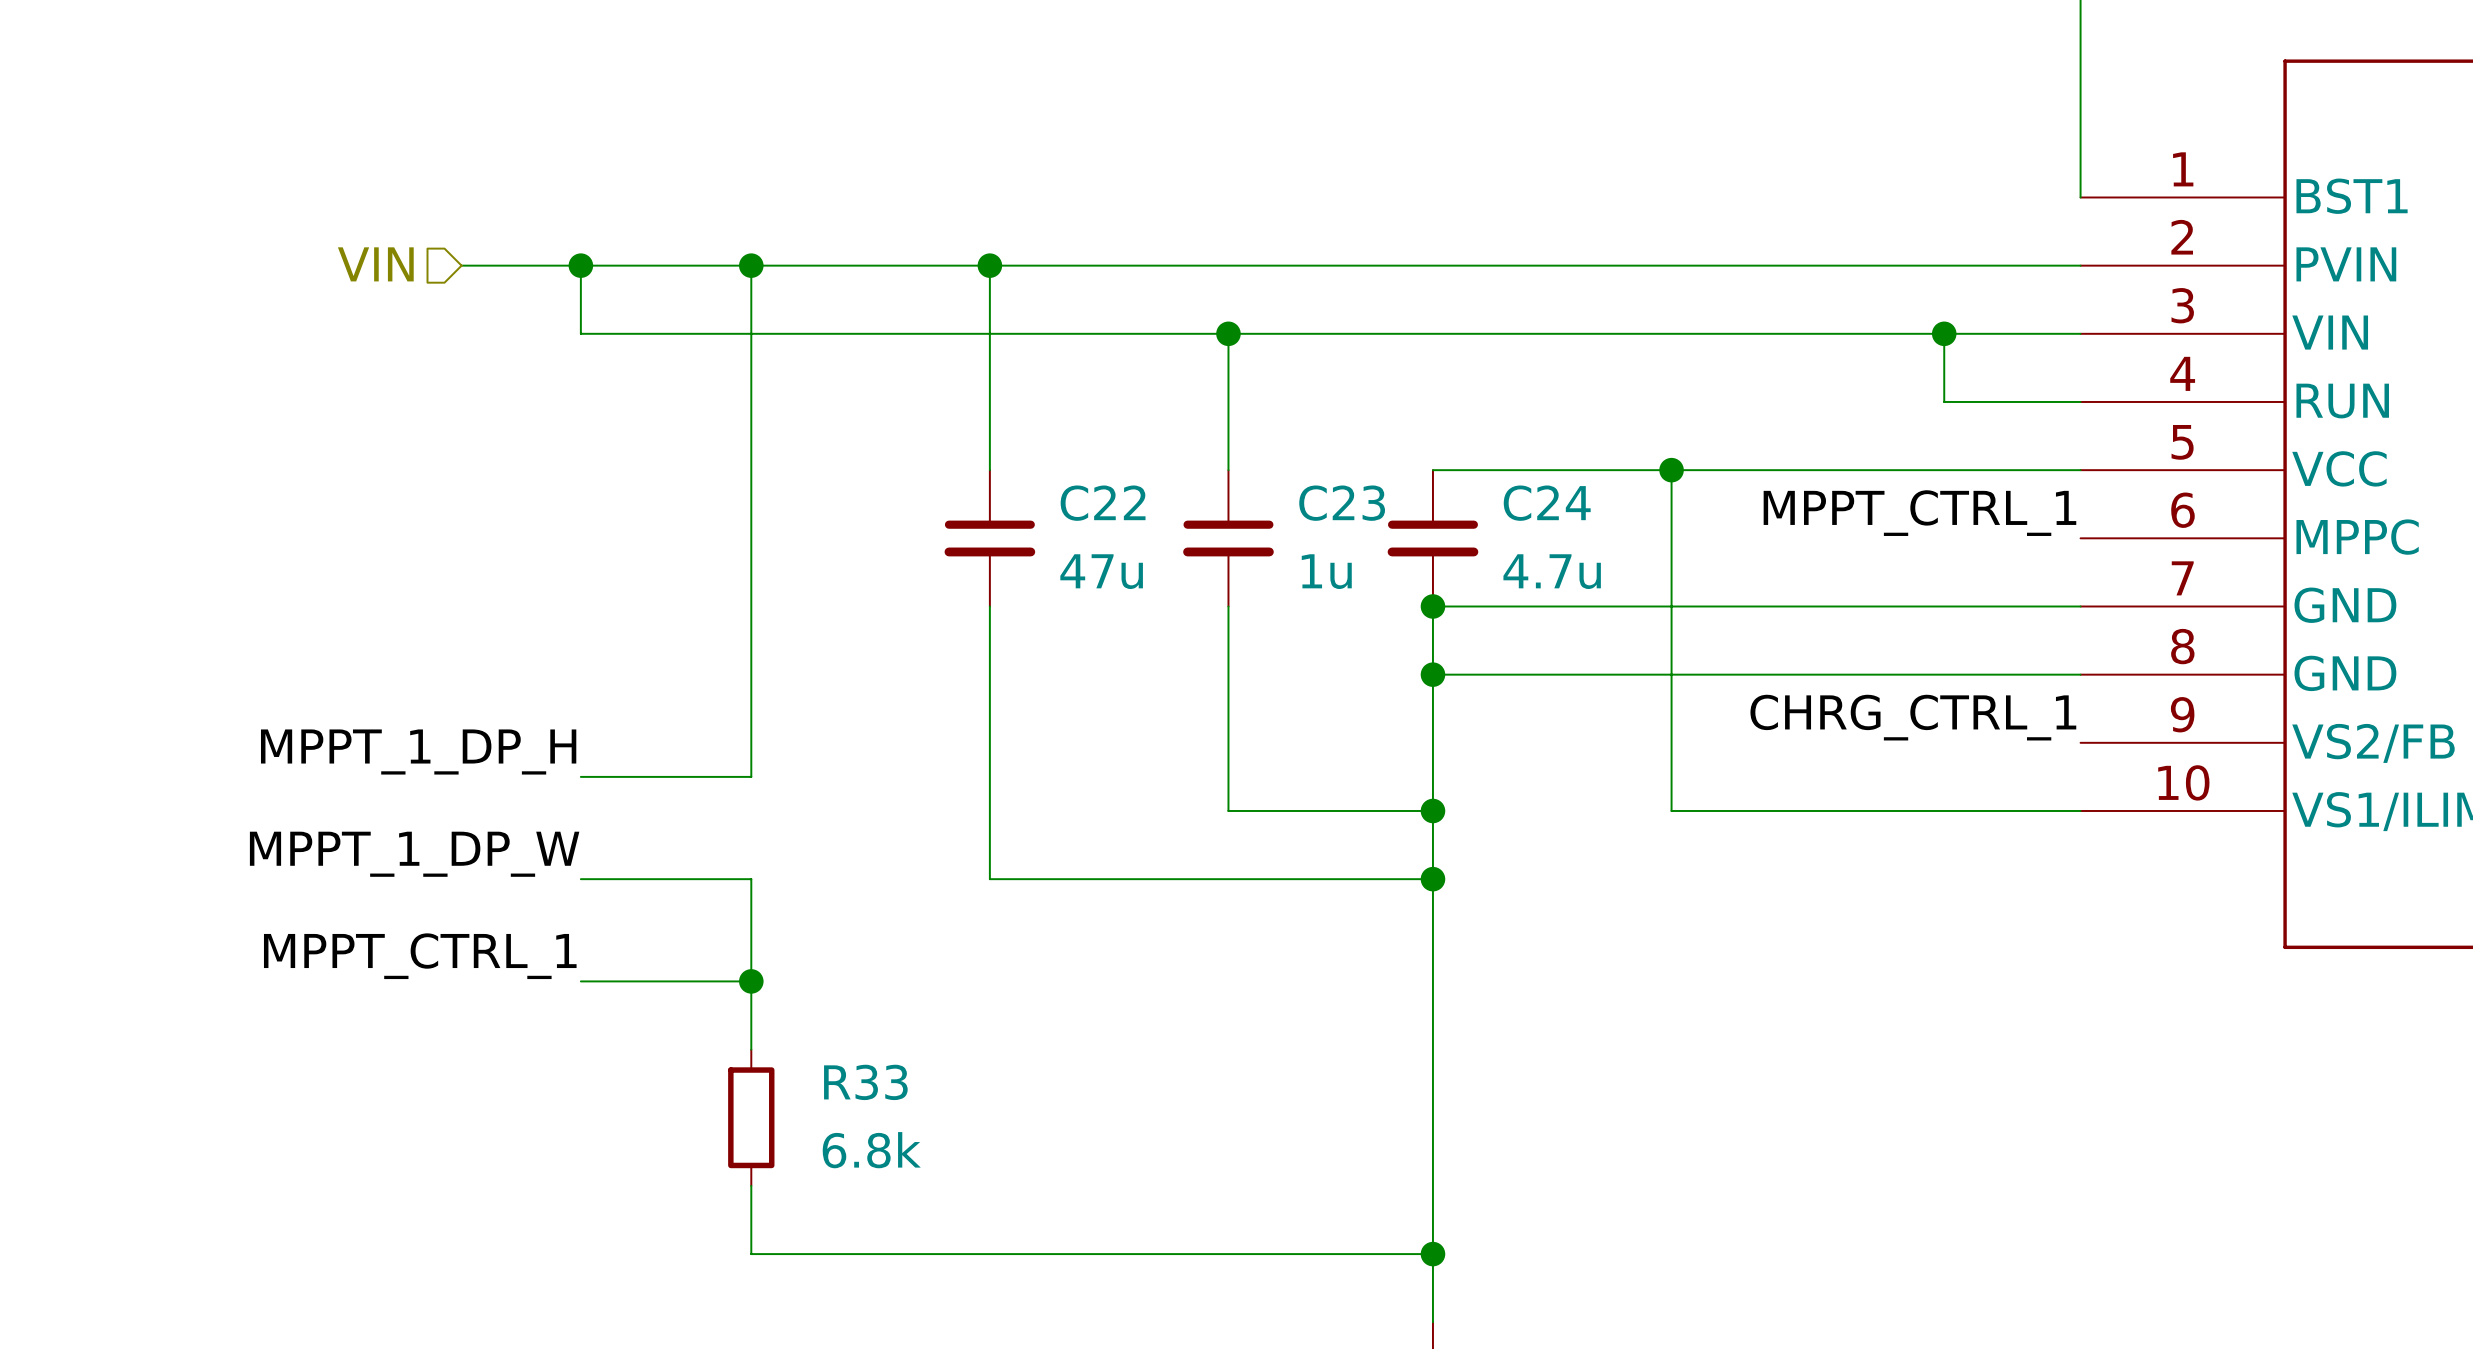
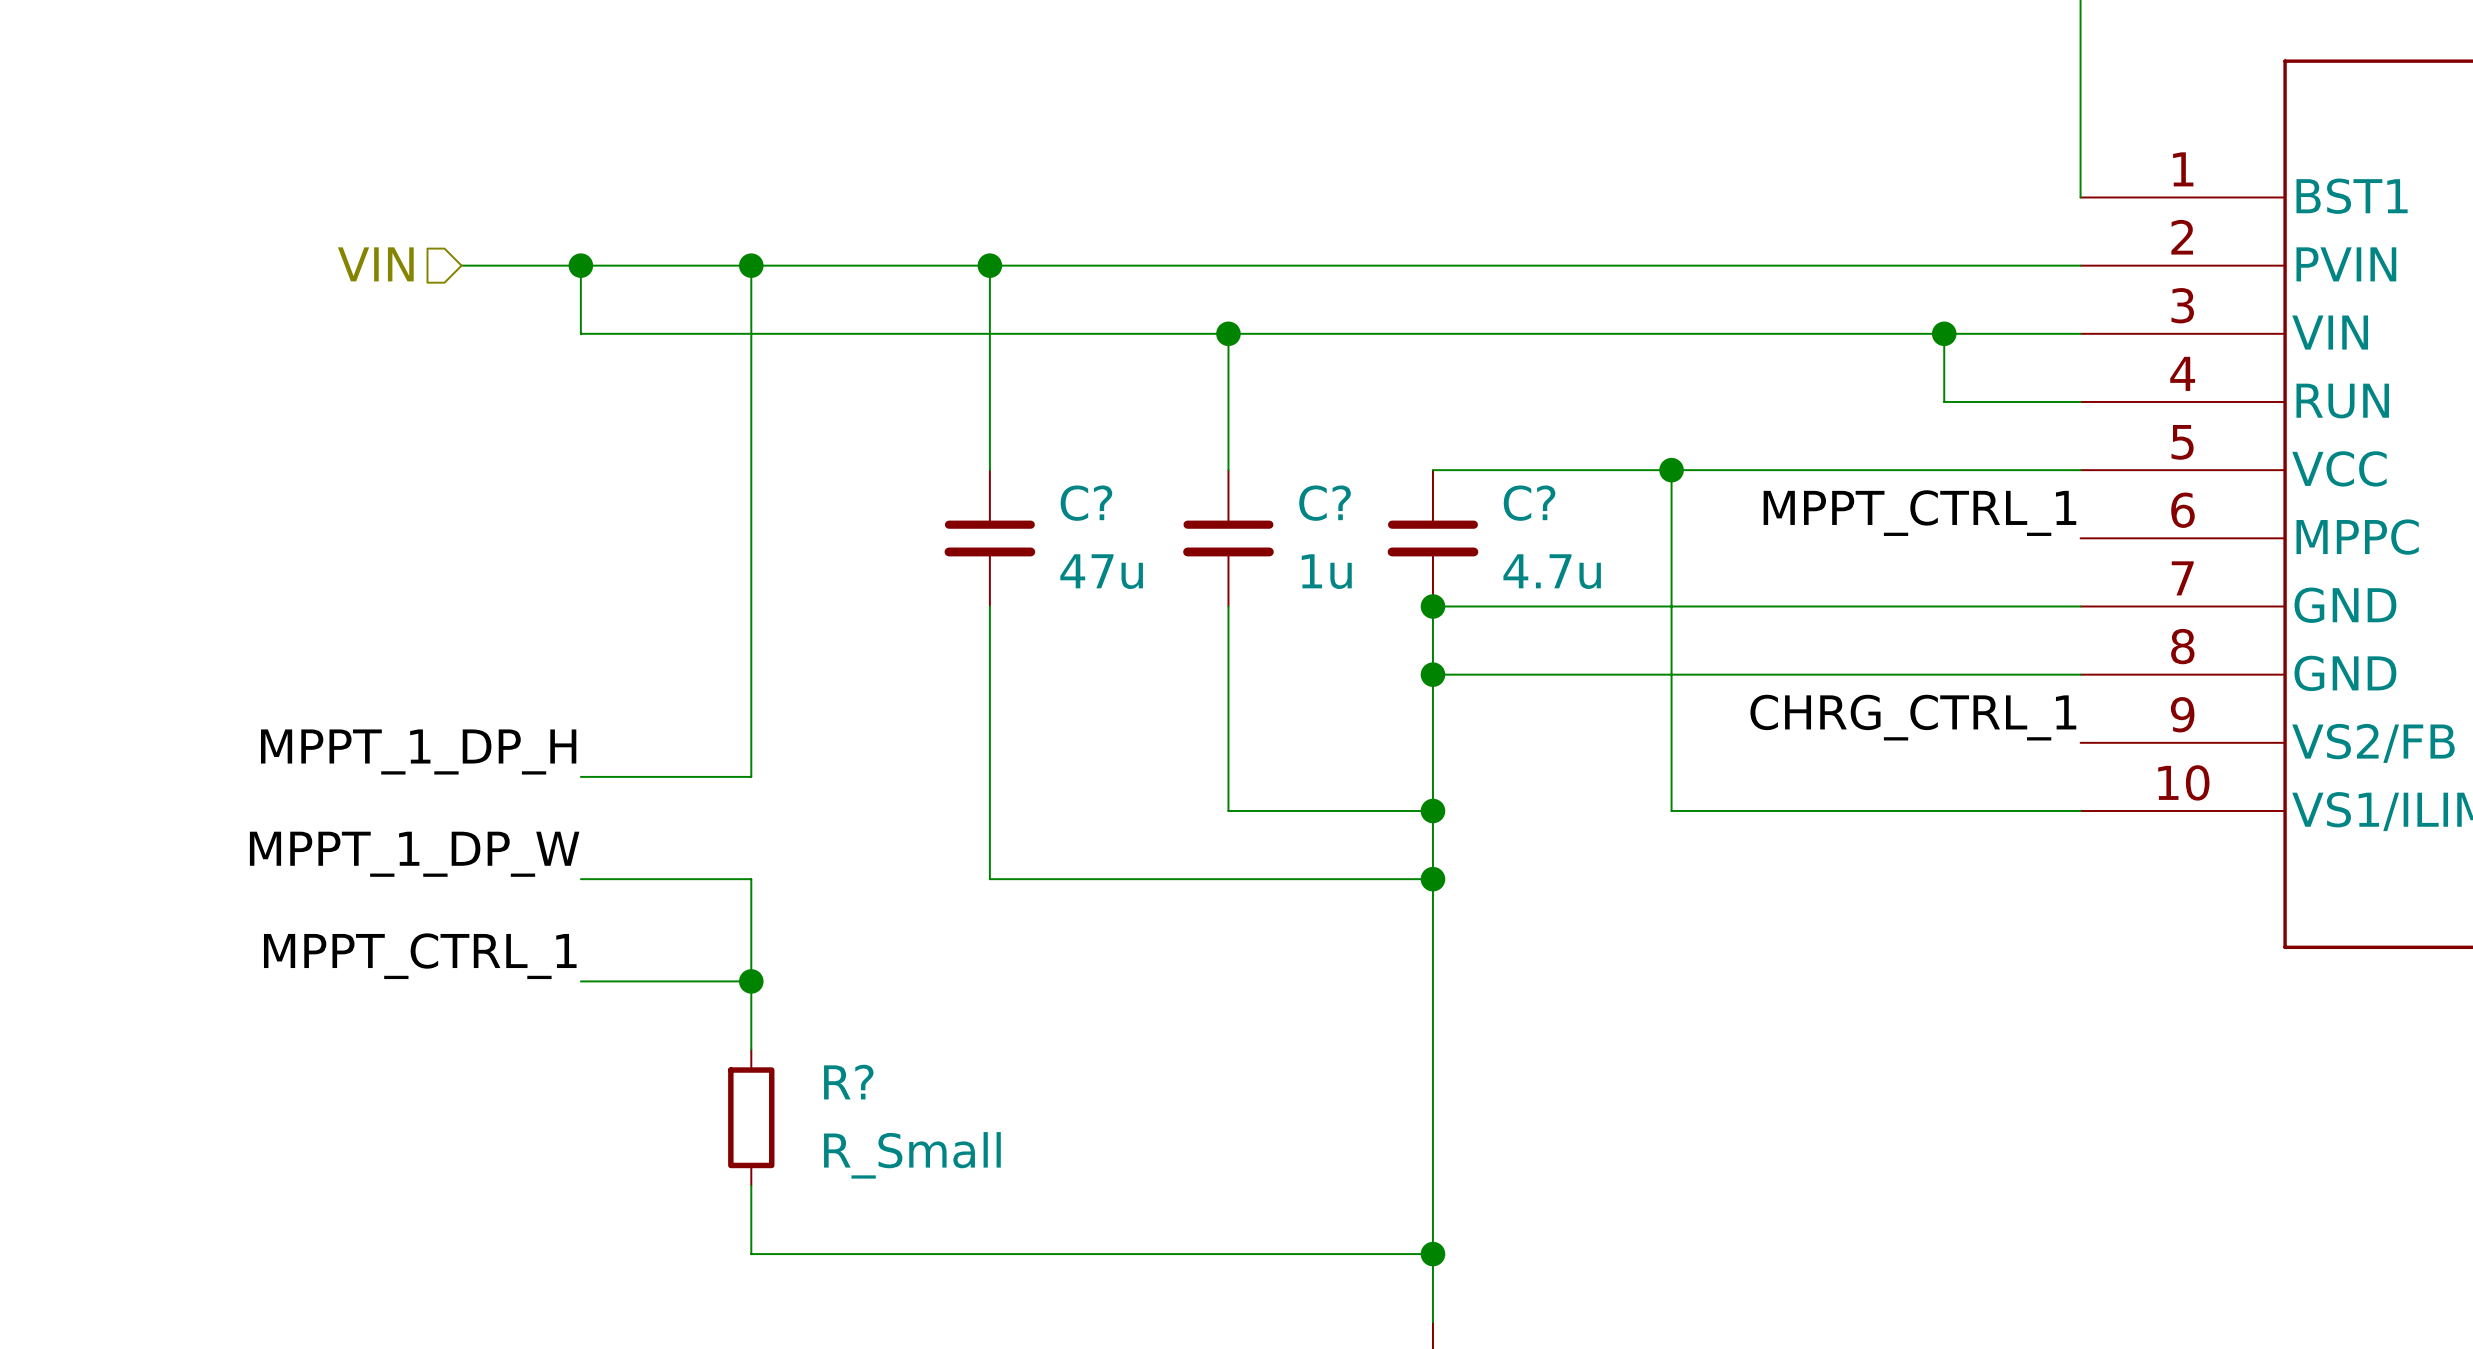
C22 name: C22 (1103, 503) -> C? (1086, 503)
C23 name: C23 (1342, 503) -> C? (1325, 503)
C24 name: C24 (1547, 503) -> C? (1529, 503)
R33 name: R33 (865, 1082) -> R? (848, 1082)
R33 value: 6.8k (871, 1150) -> R_Small (912, 1155)

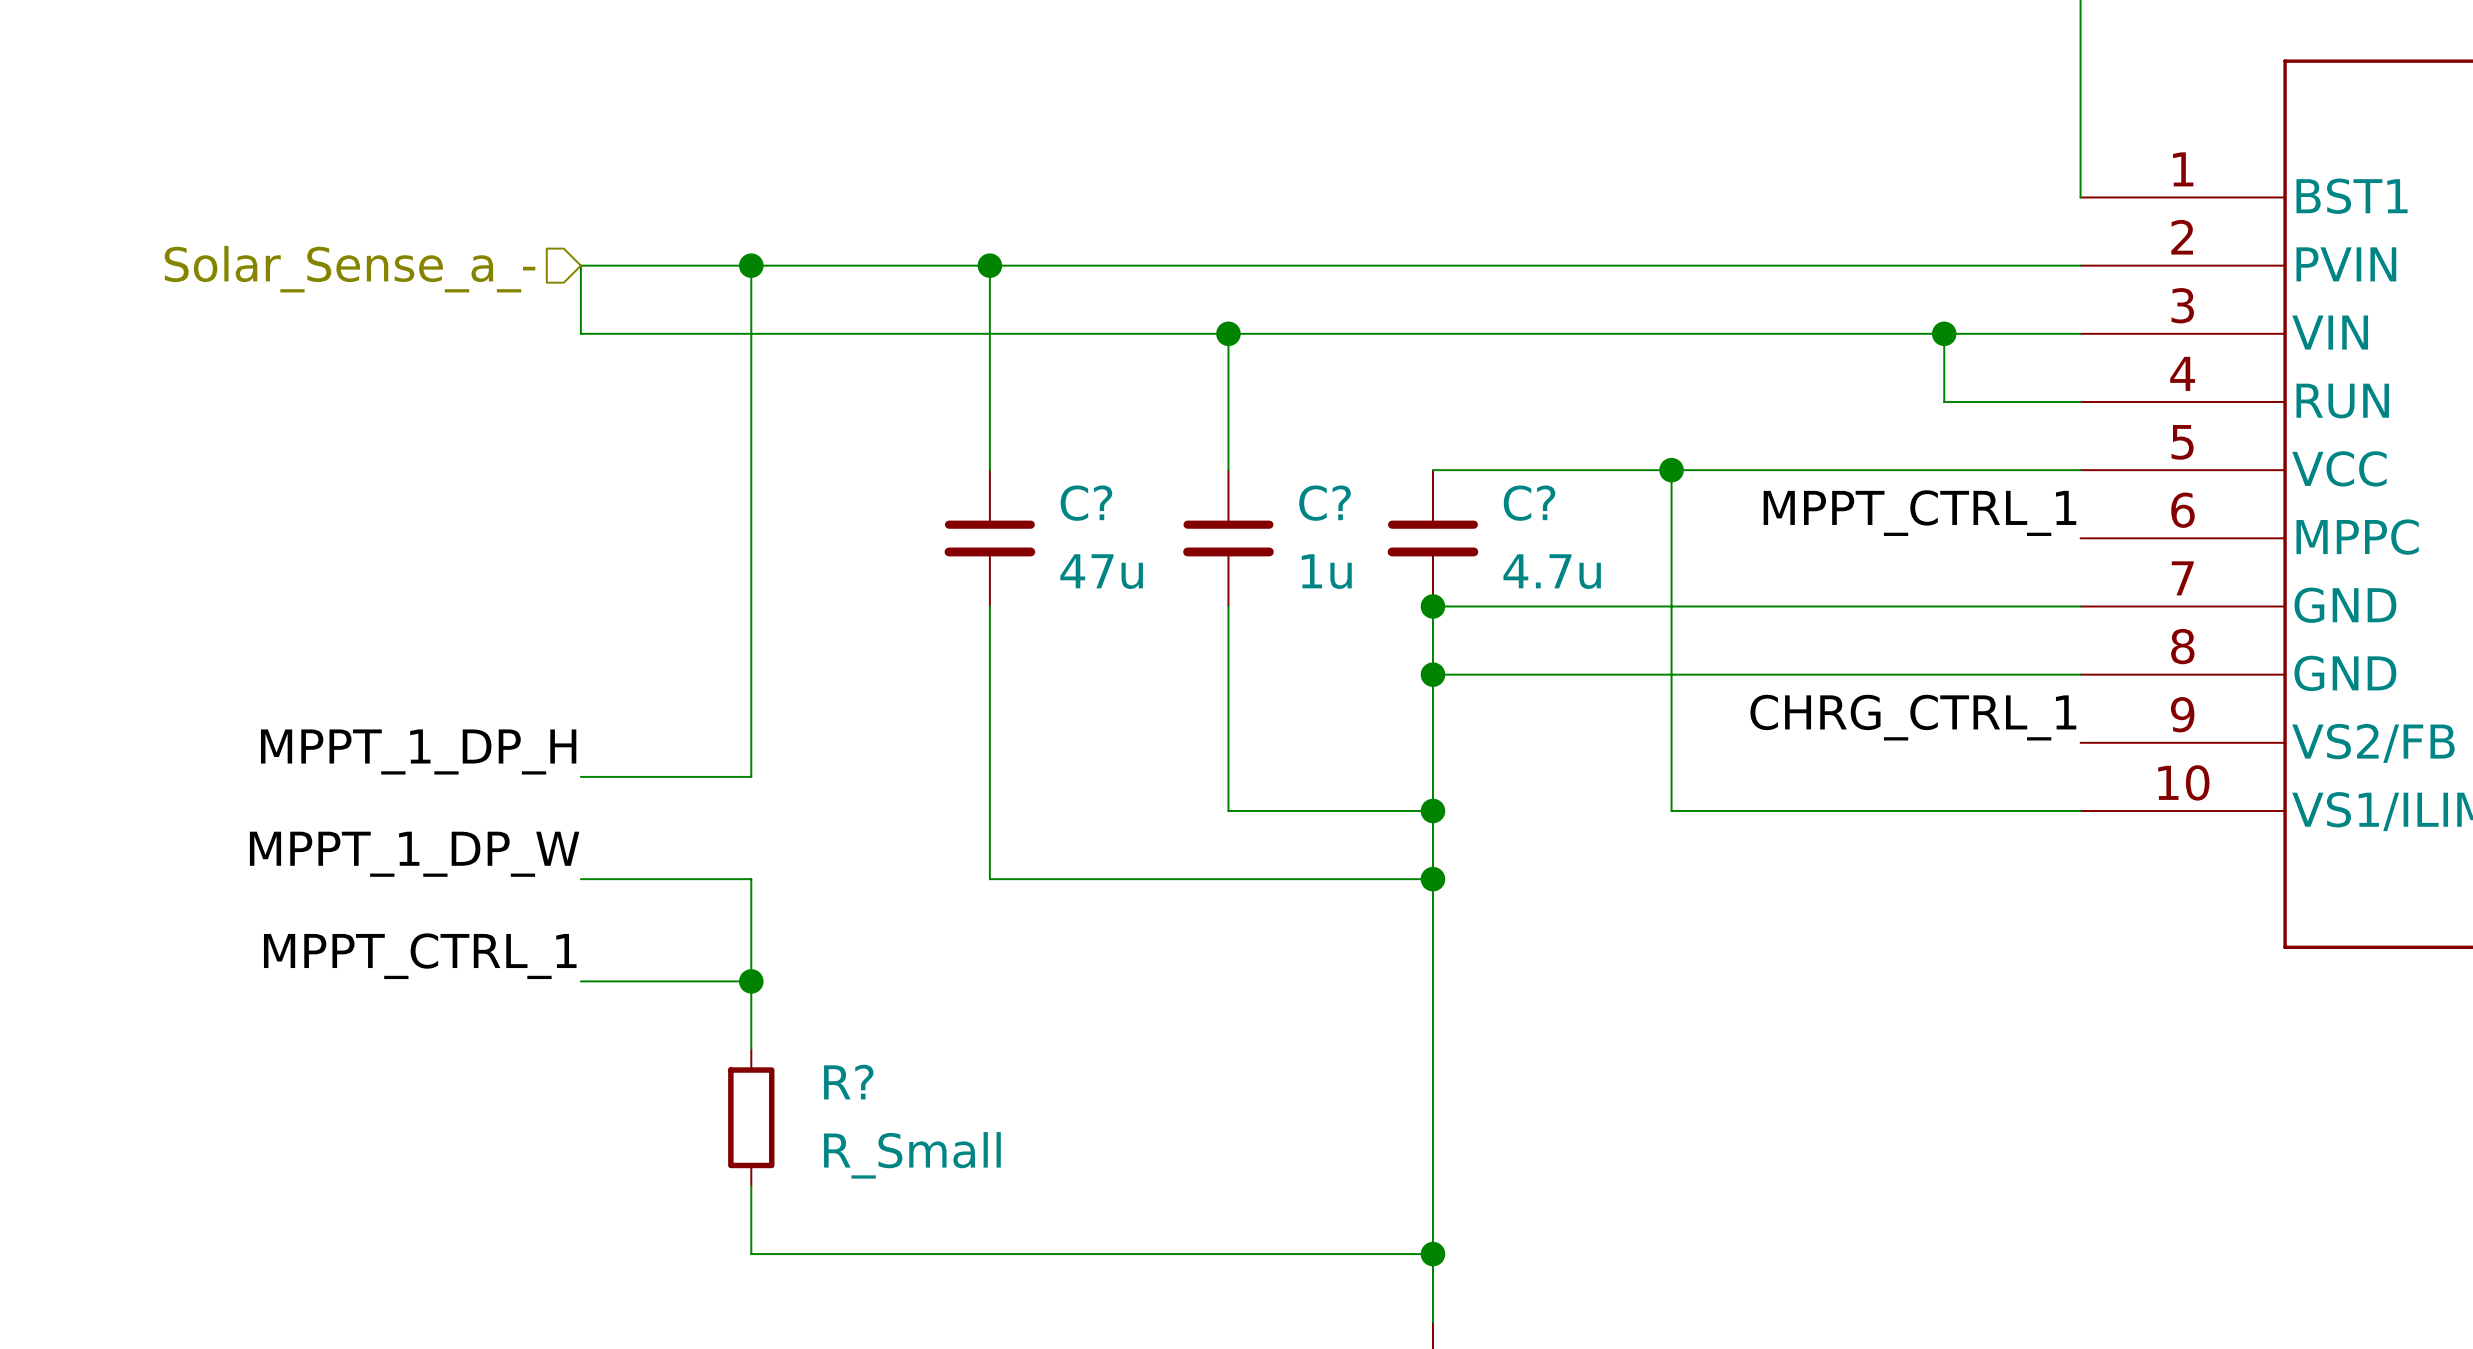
hierarchical label: VIN (375, 264) -> none
wire: (461, 265) (580, 265) -> none
junction: (580, 265) -> none
hierarchical label: none -> Solar_Sense_a_- (350, 269)

